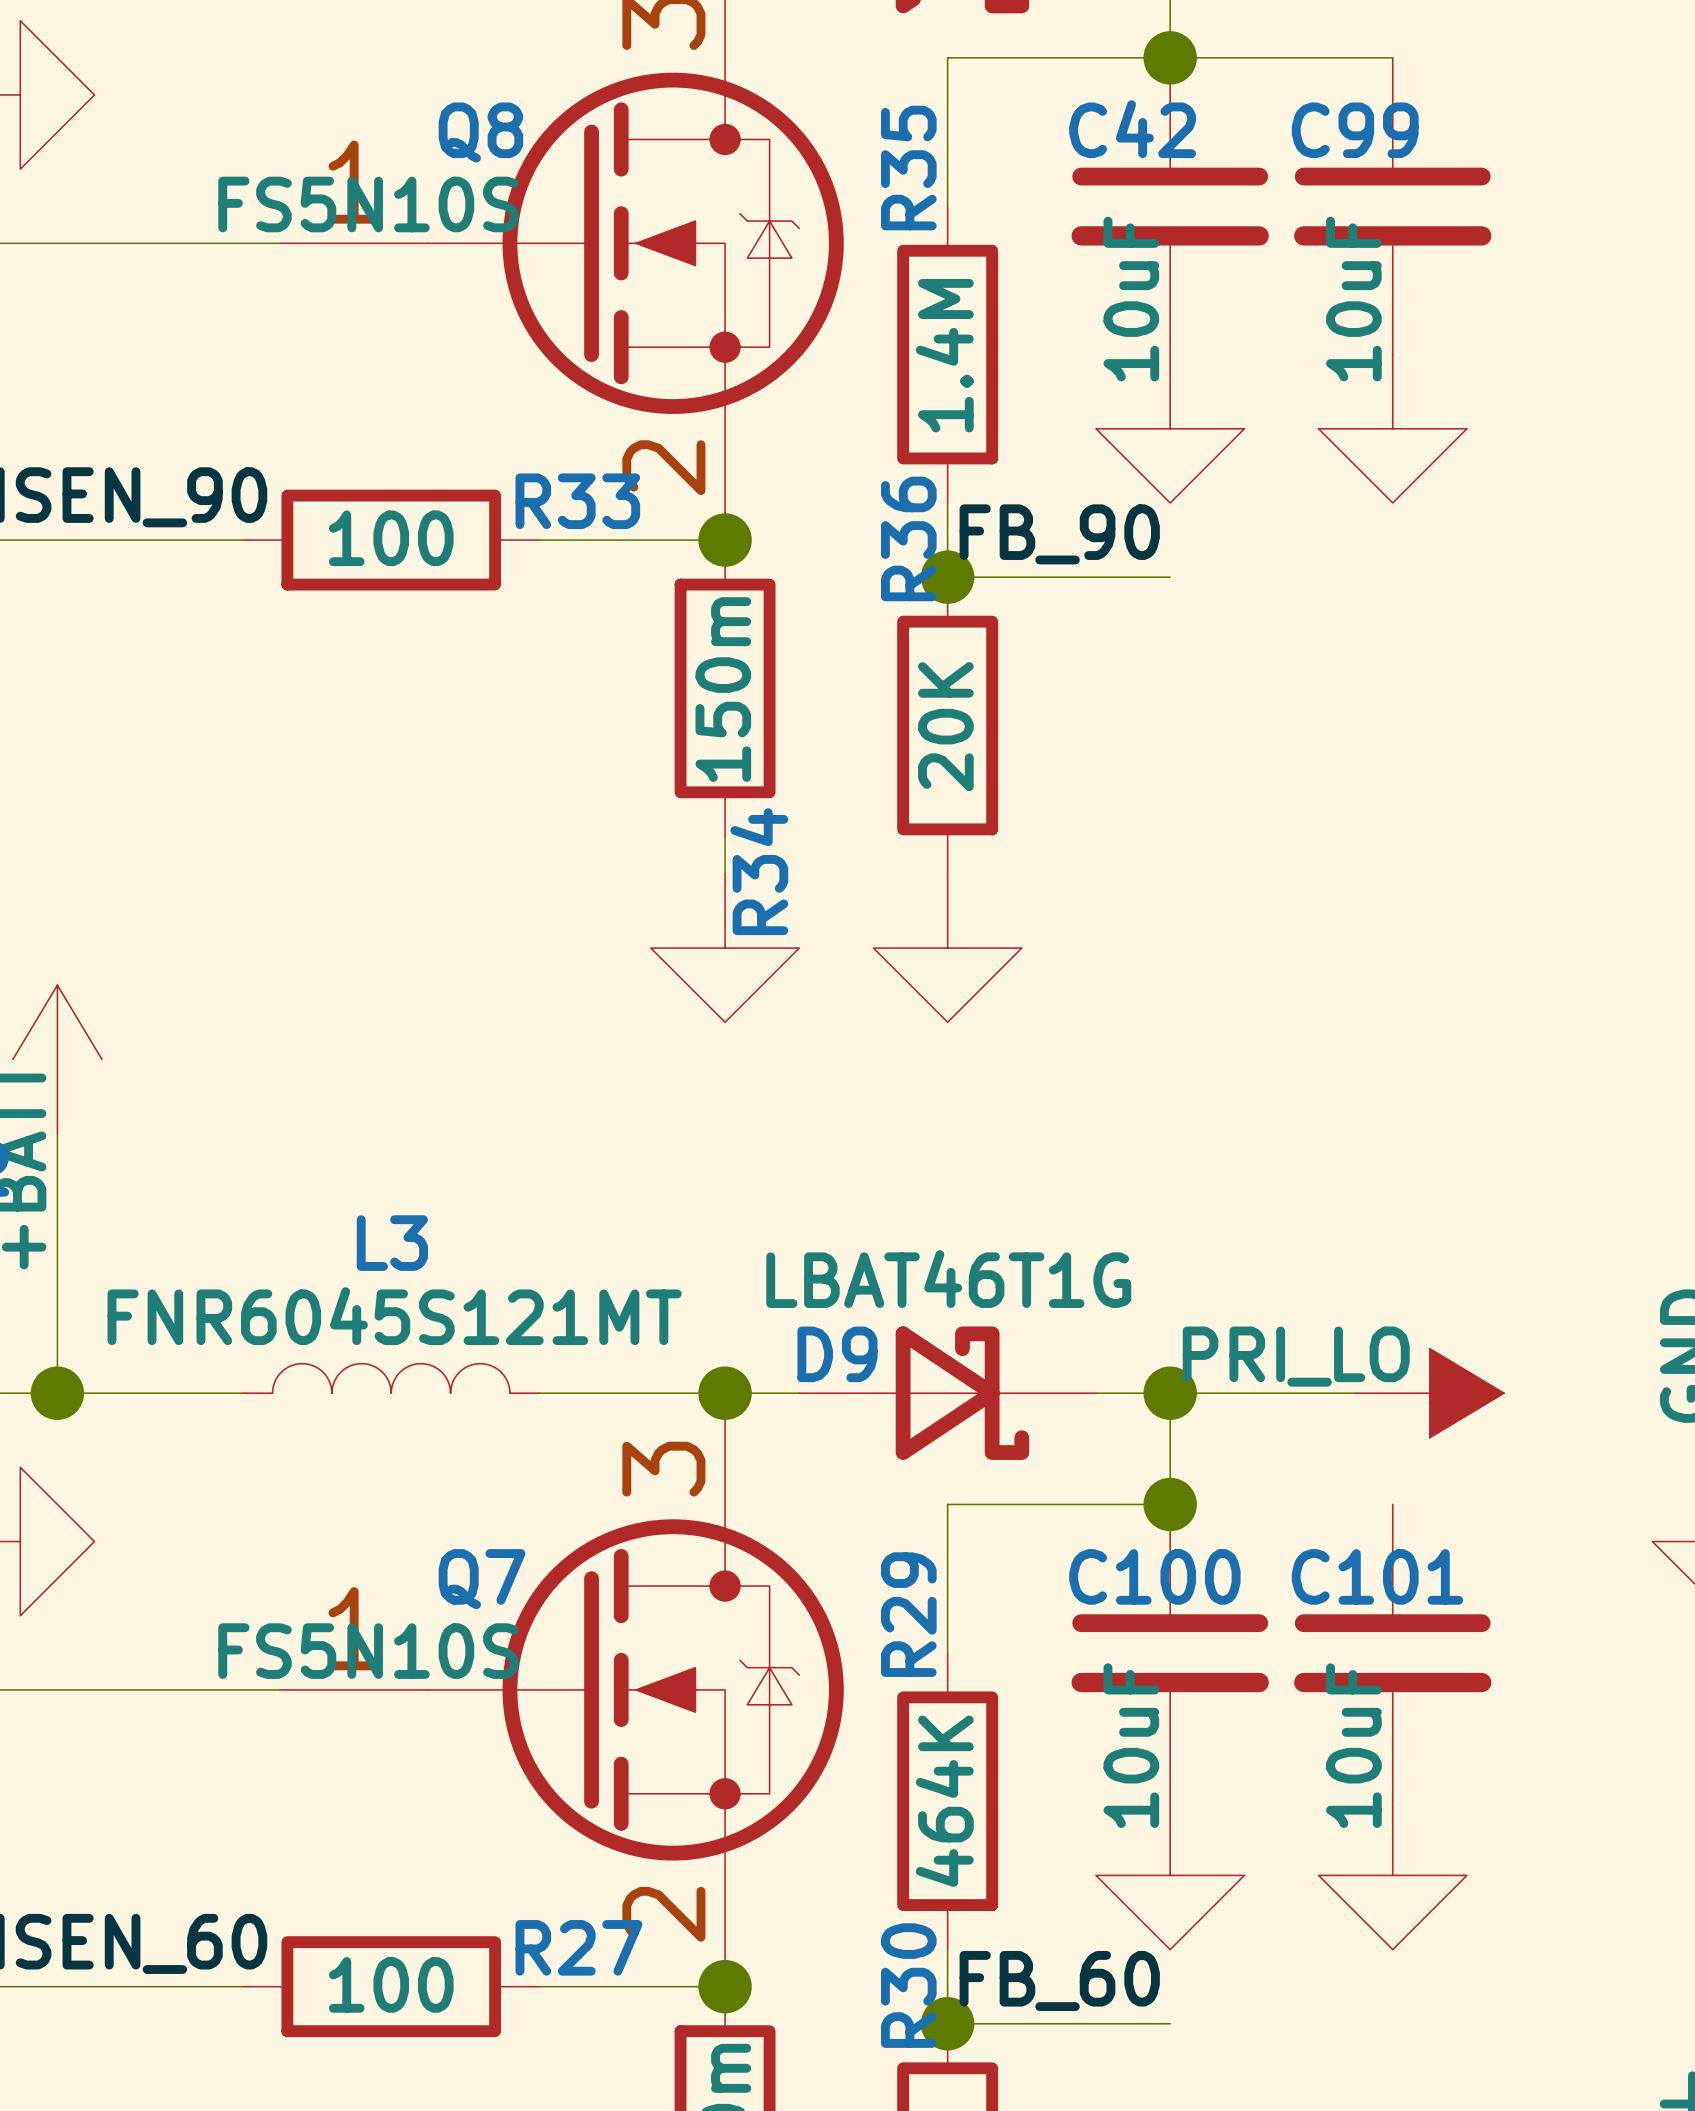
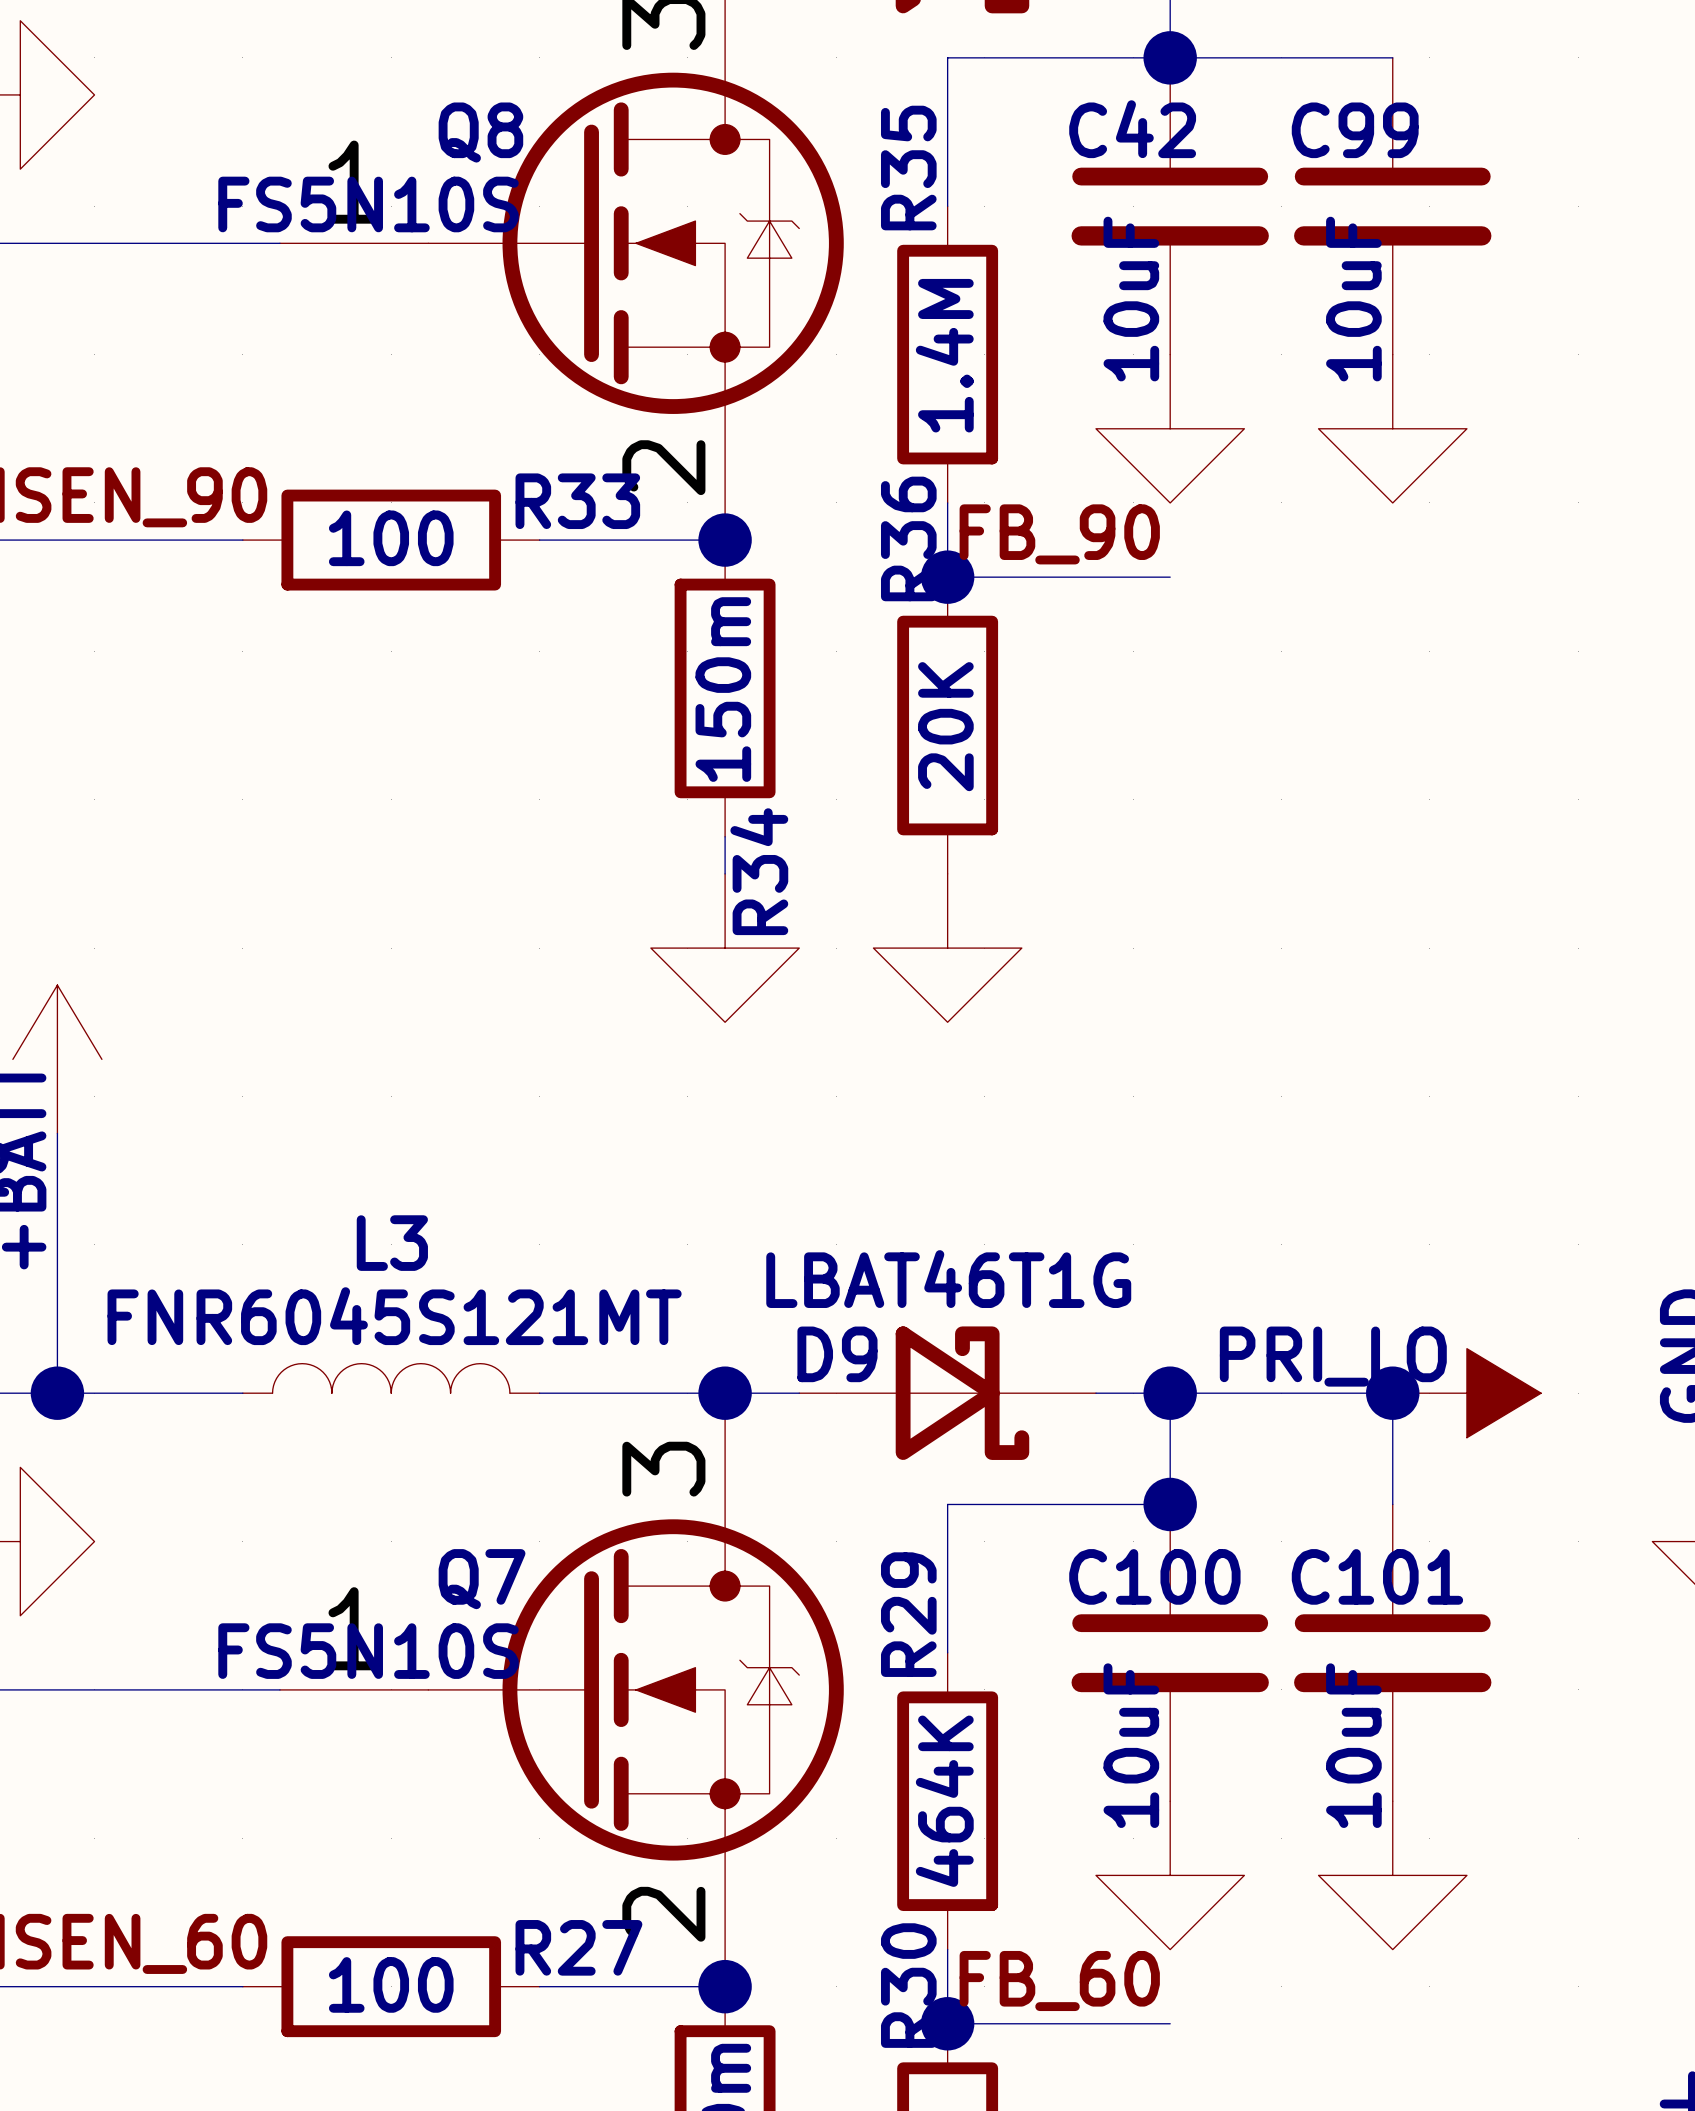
wire: none -> (1355, 1393) (1392, 1393) (1392, 1504)
junction: none -> (1392, 1393)
power symbol position: PRI_LO (1429, 1393) -> PRI_LO (1466, 1393)

